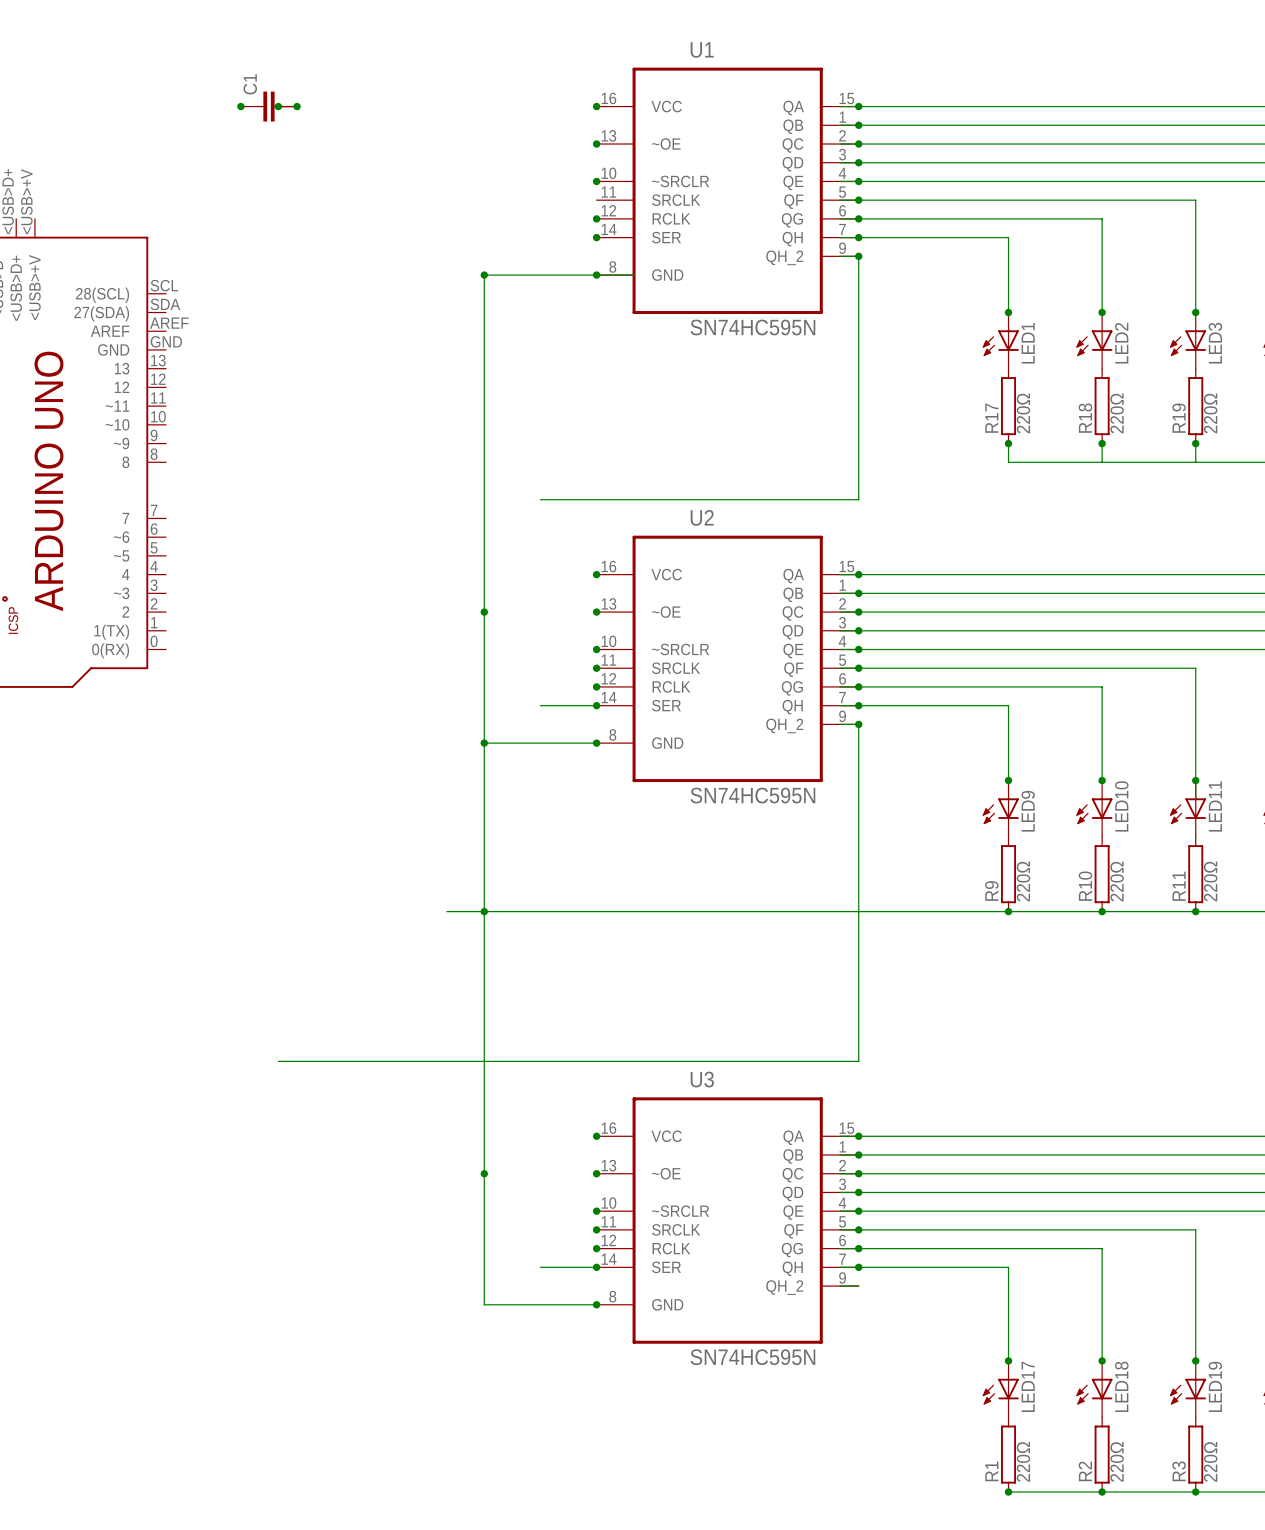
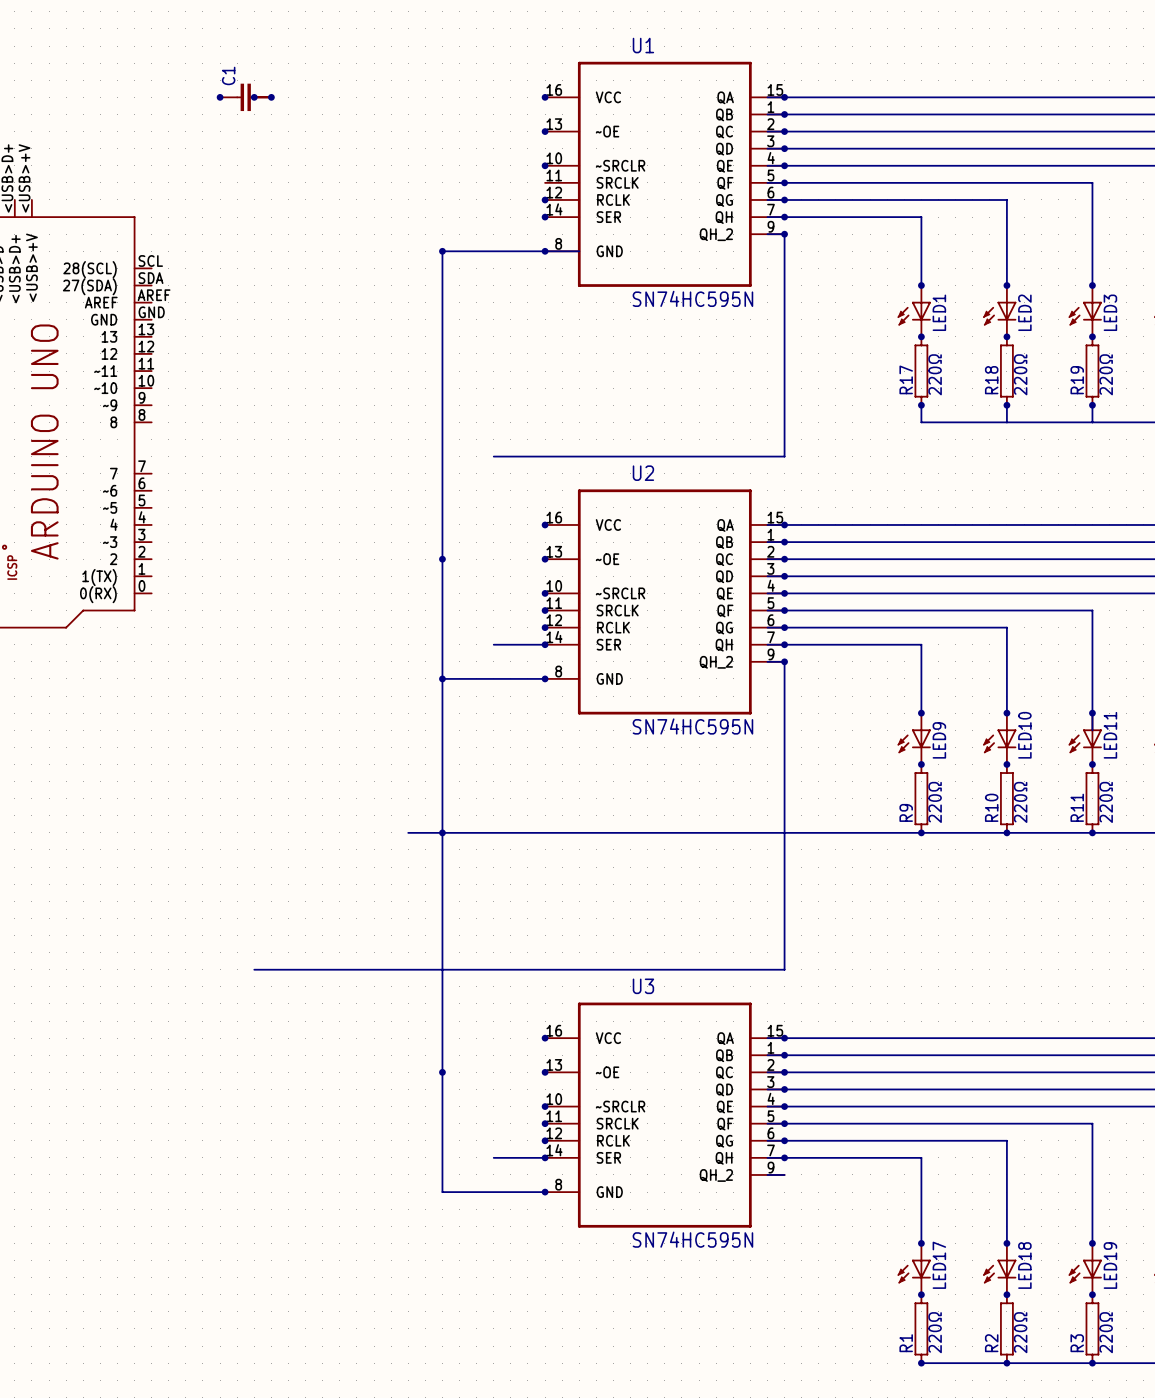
junction: none -> (921, 336)
junction: none -> (1006, 336)
junction: none -> (1092, 336)
junction: none -> (921, 764)
junction: none -> (1006, 764)
junction: none -> (1092, 764)
junction: none -> (921, 1294)
junction: none -> (1006, 1294)
junction: none -> (1092, 1294)

